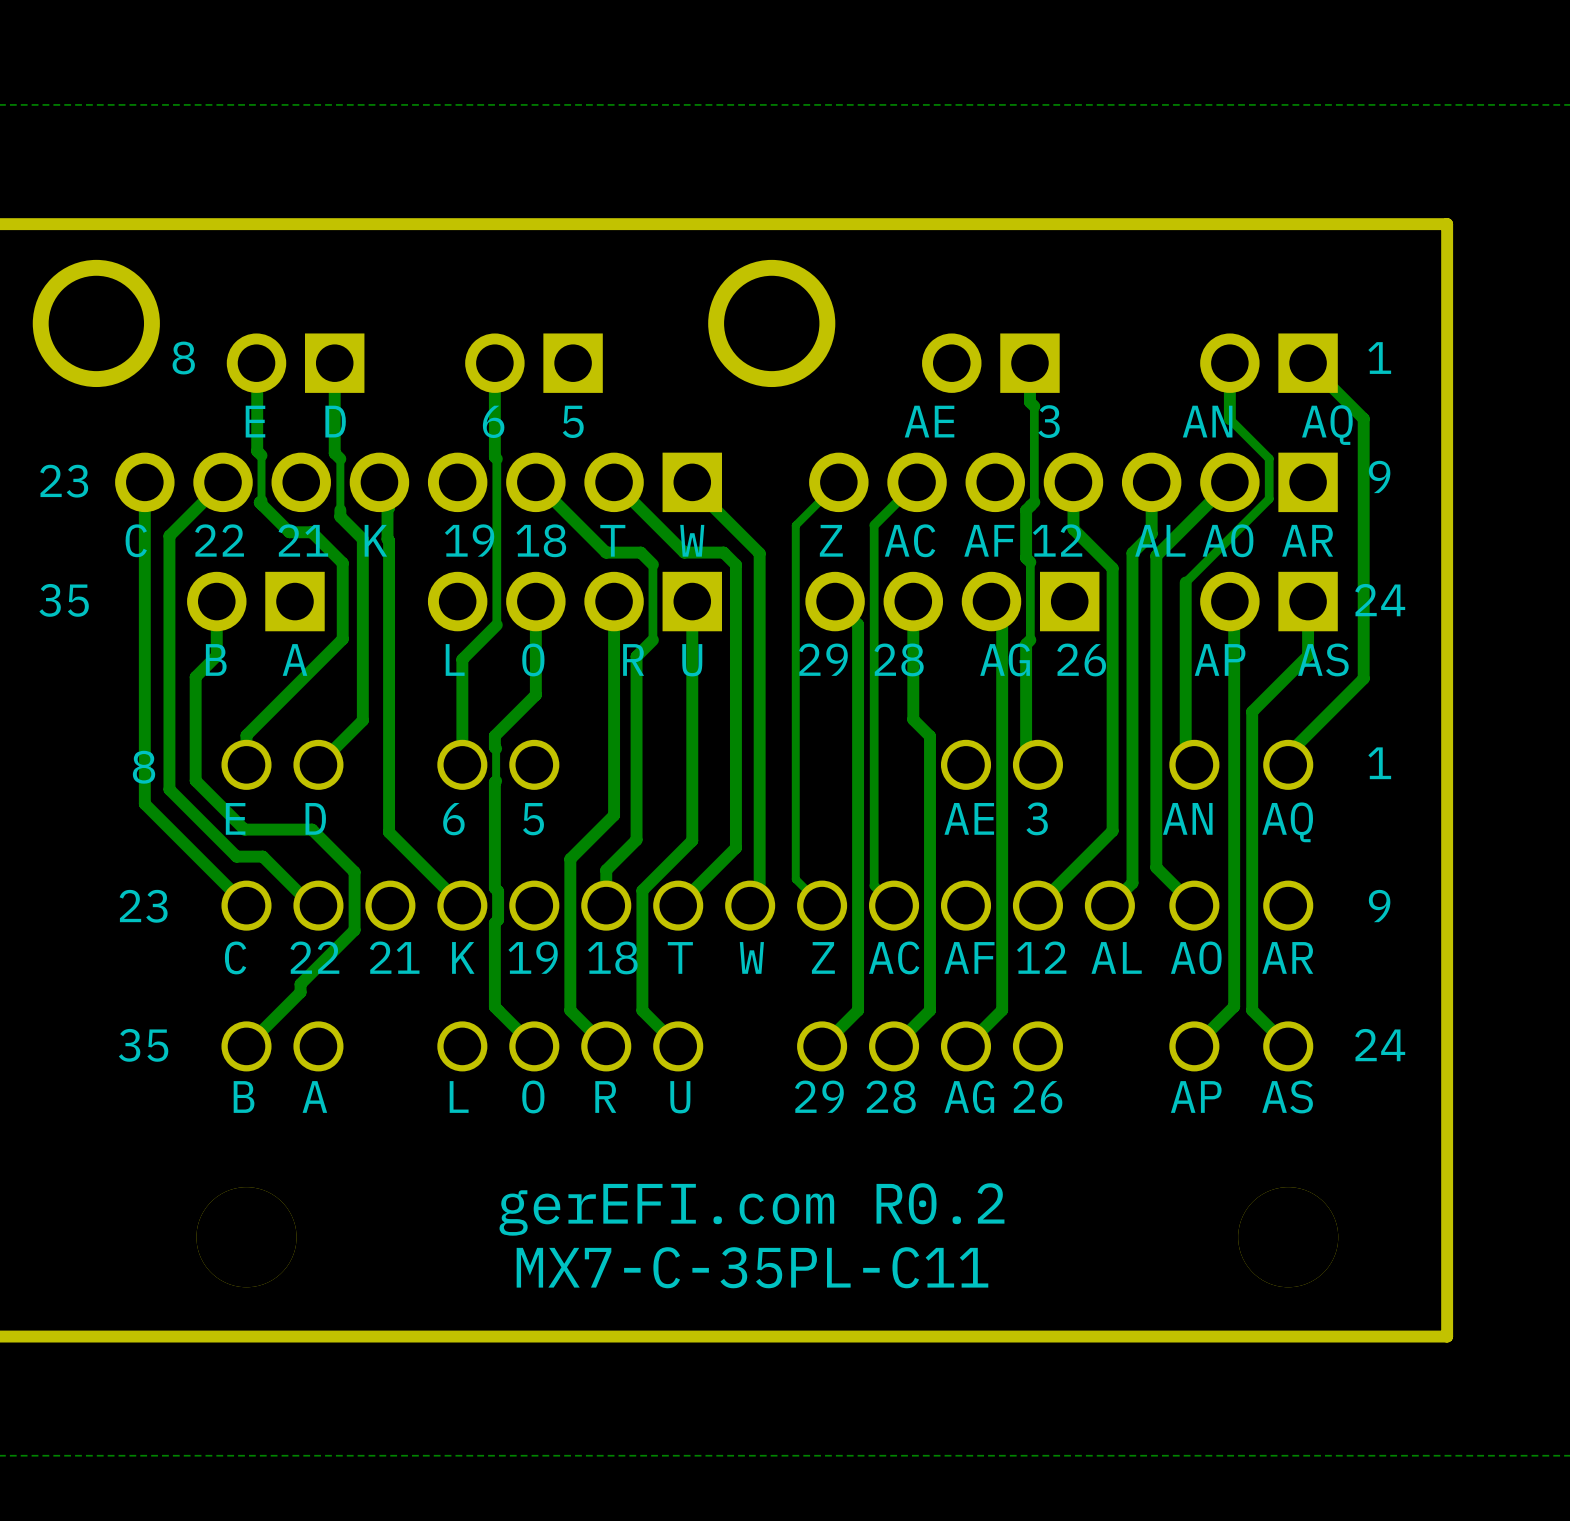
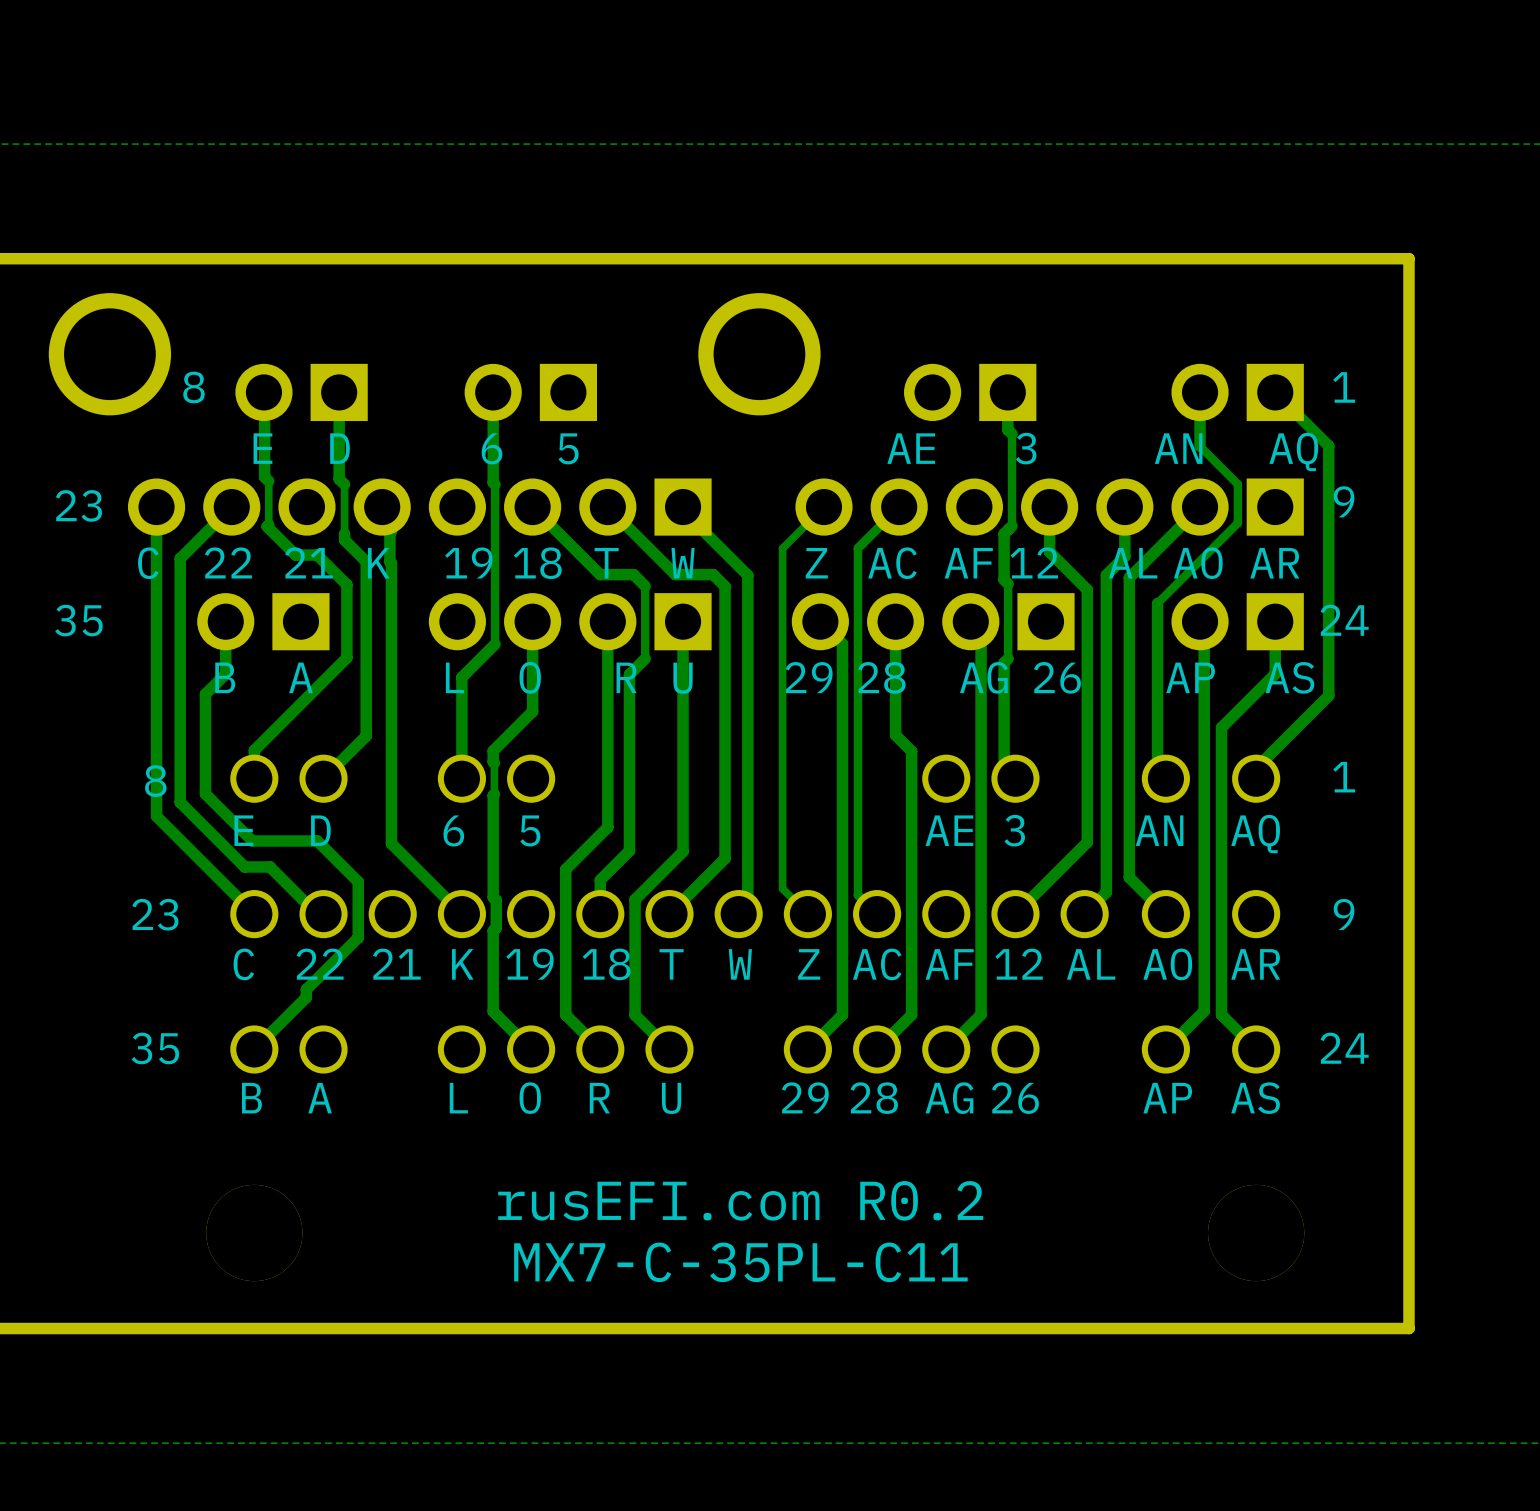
text: gerEFI.com R0.2 (751, 1209) -> rusEFI.com R0.2 (740, 1200)

